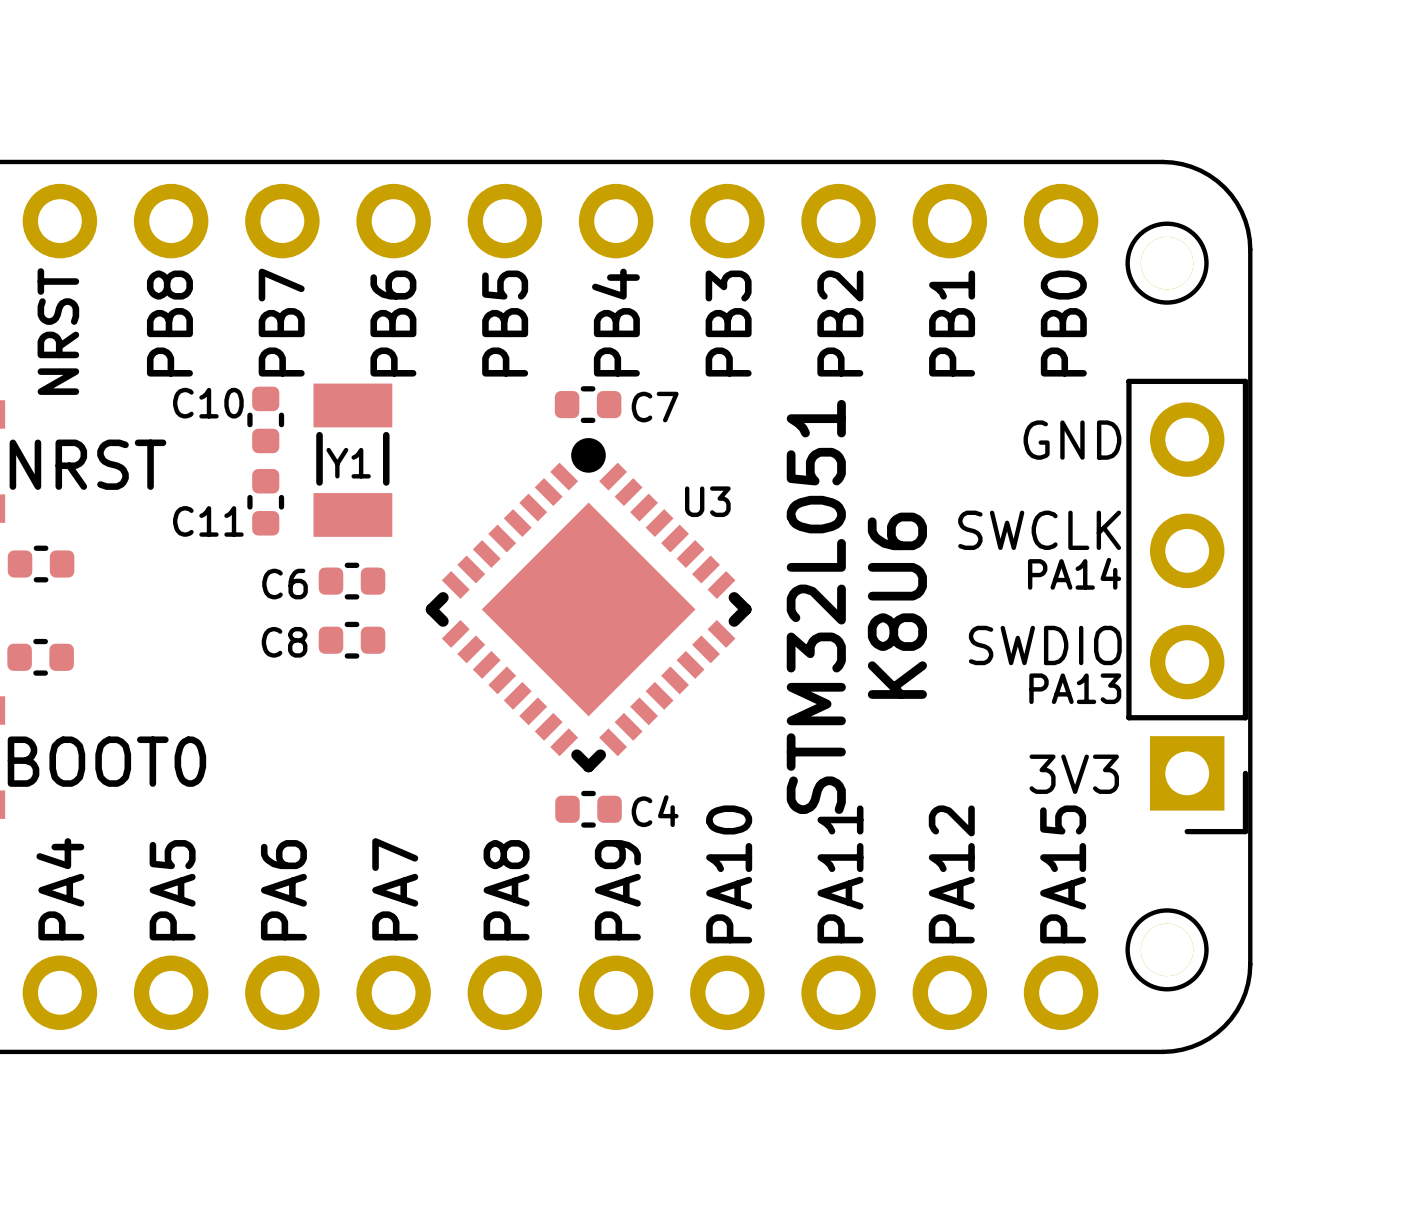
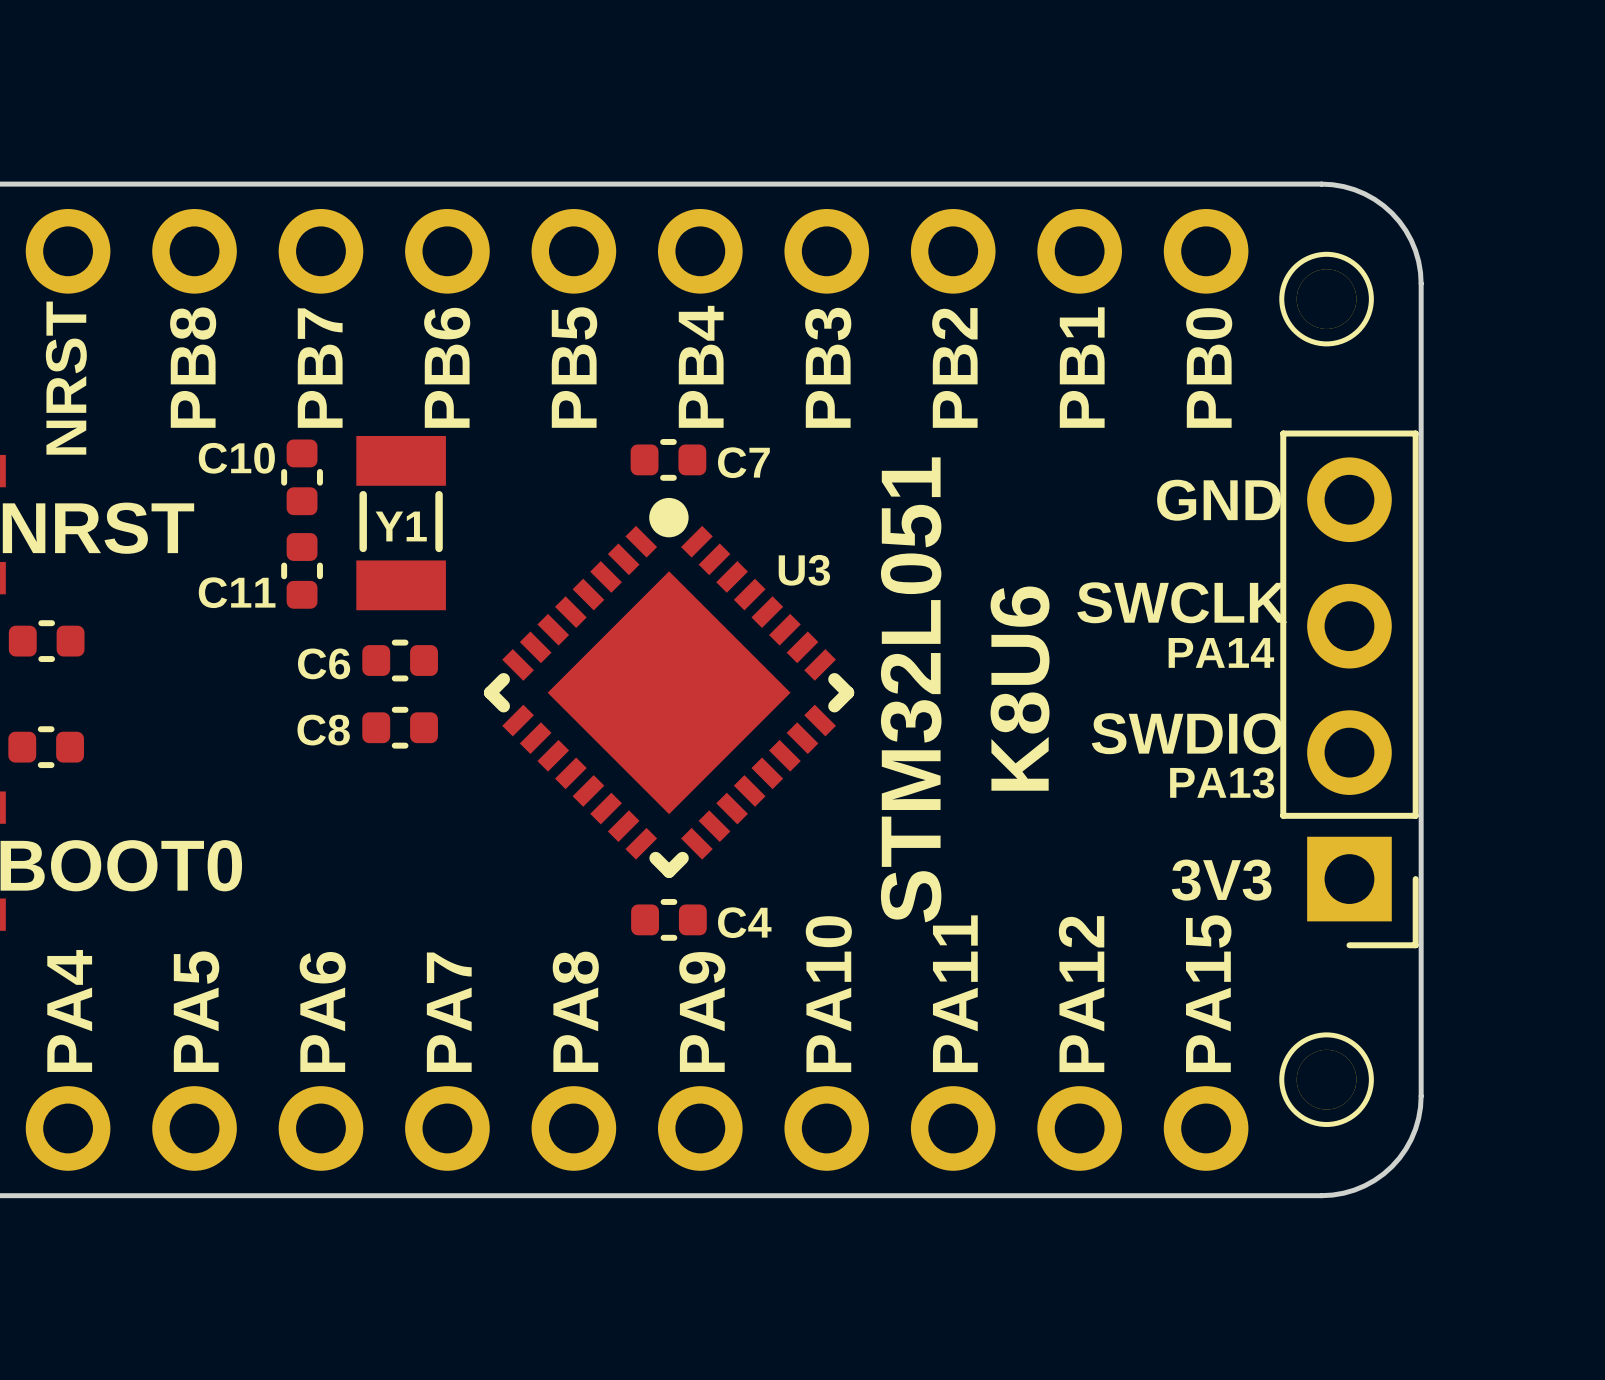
text position: STM32L051 (816, 606) -> STM32L051 (911, 689)

